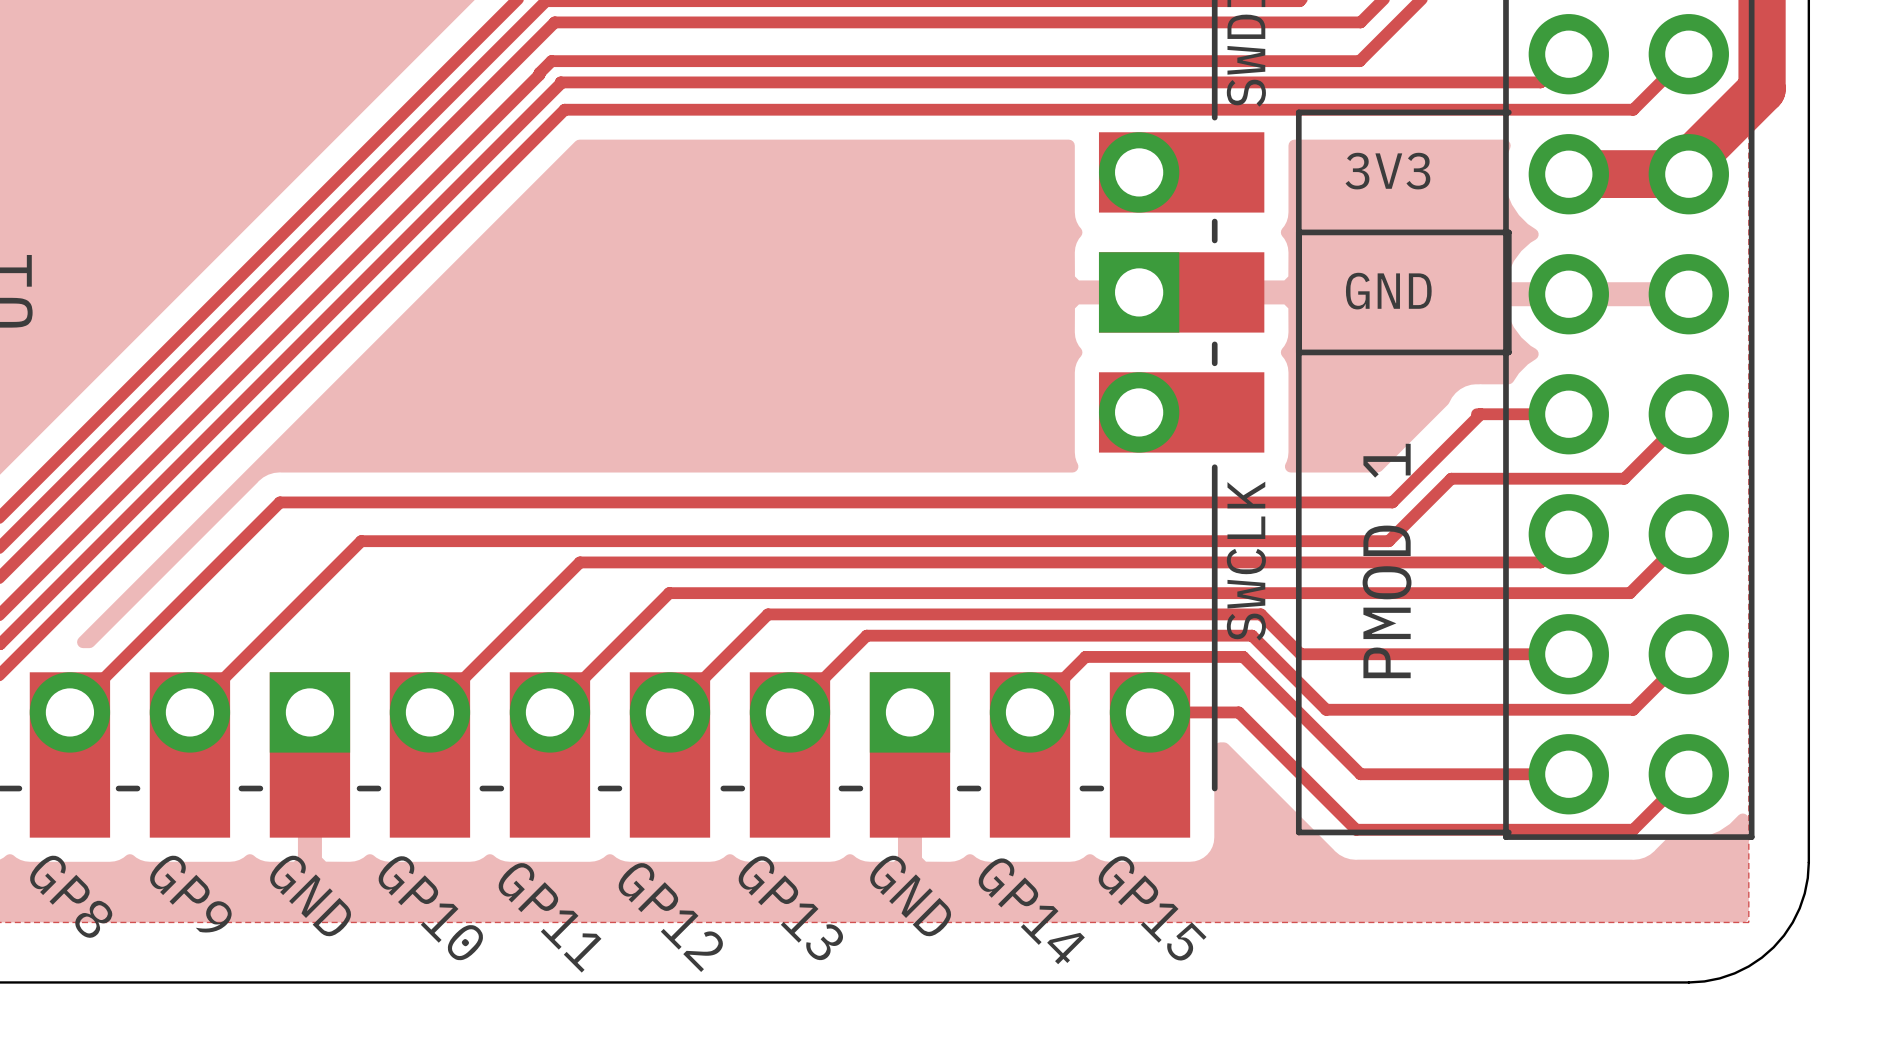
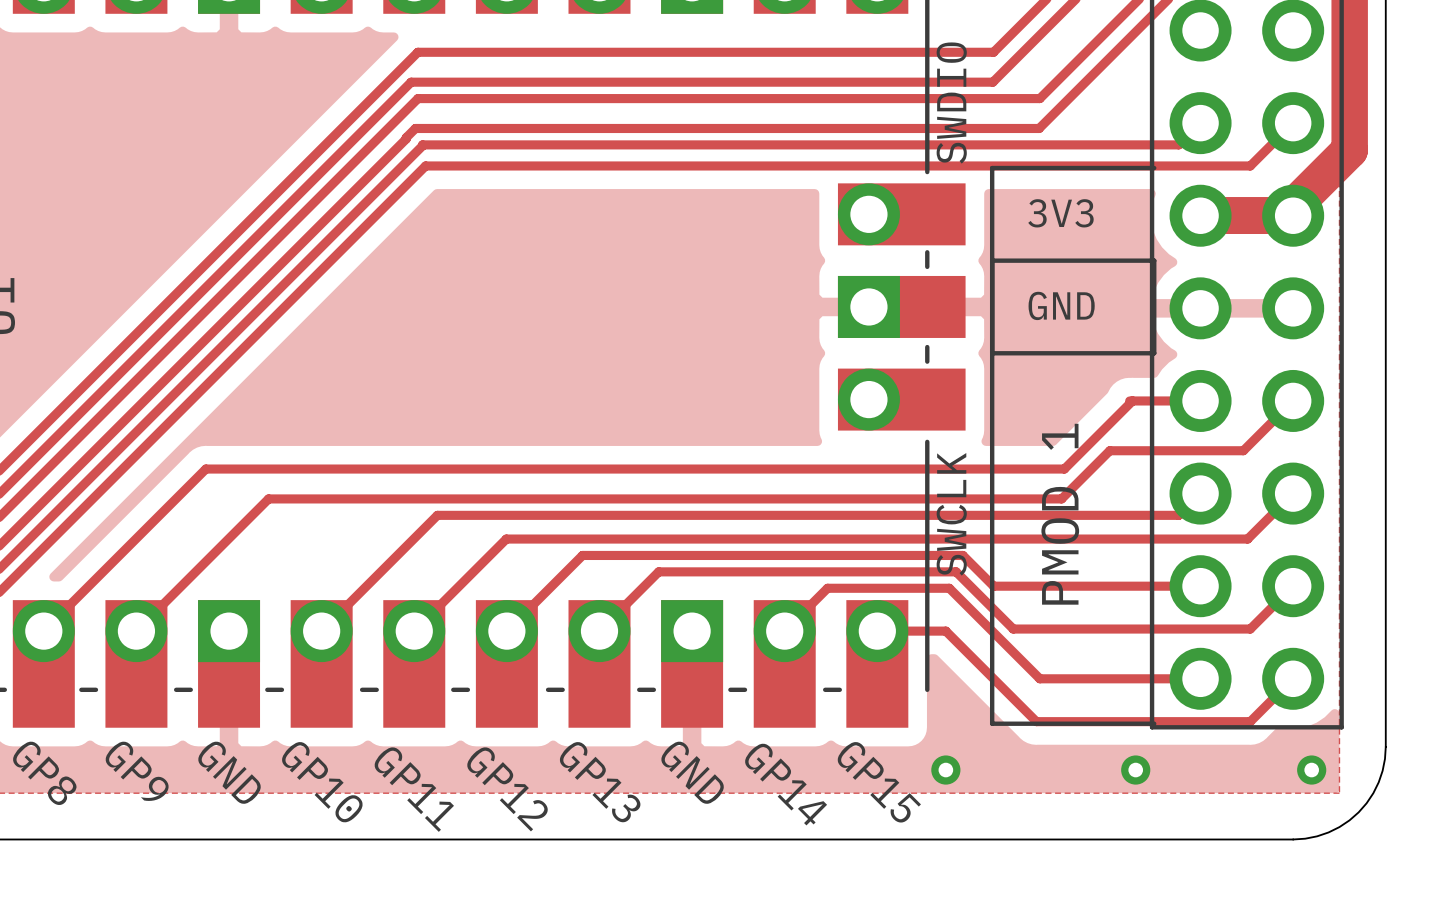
via: none -> (945, 770)
via: none -> (1135, 770)
via: none -> (1311, 770)

